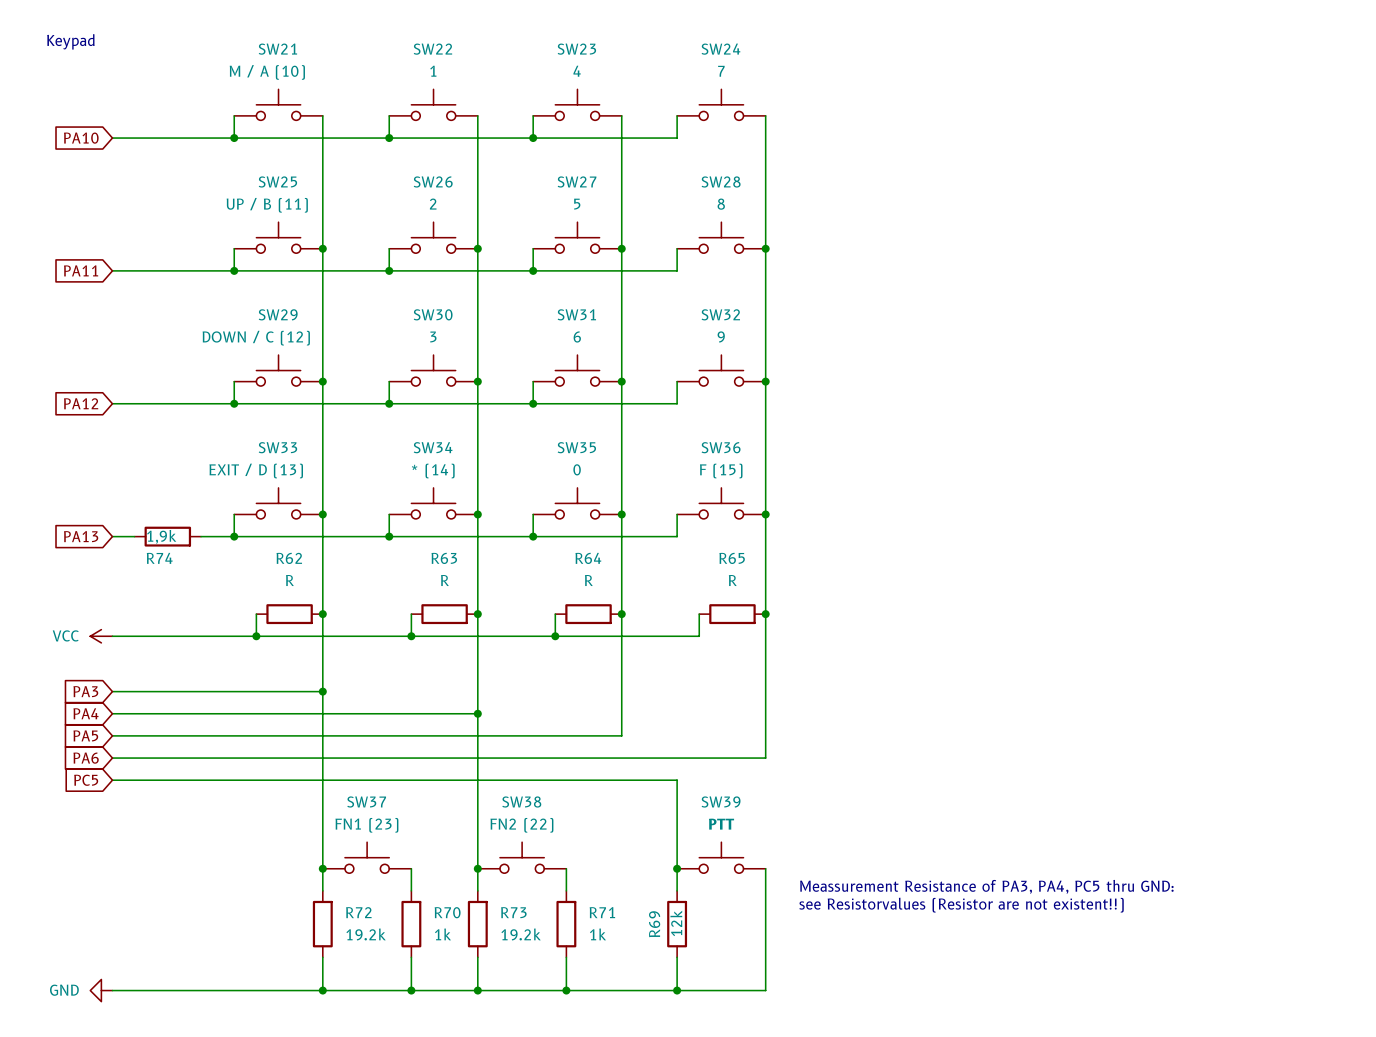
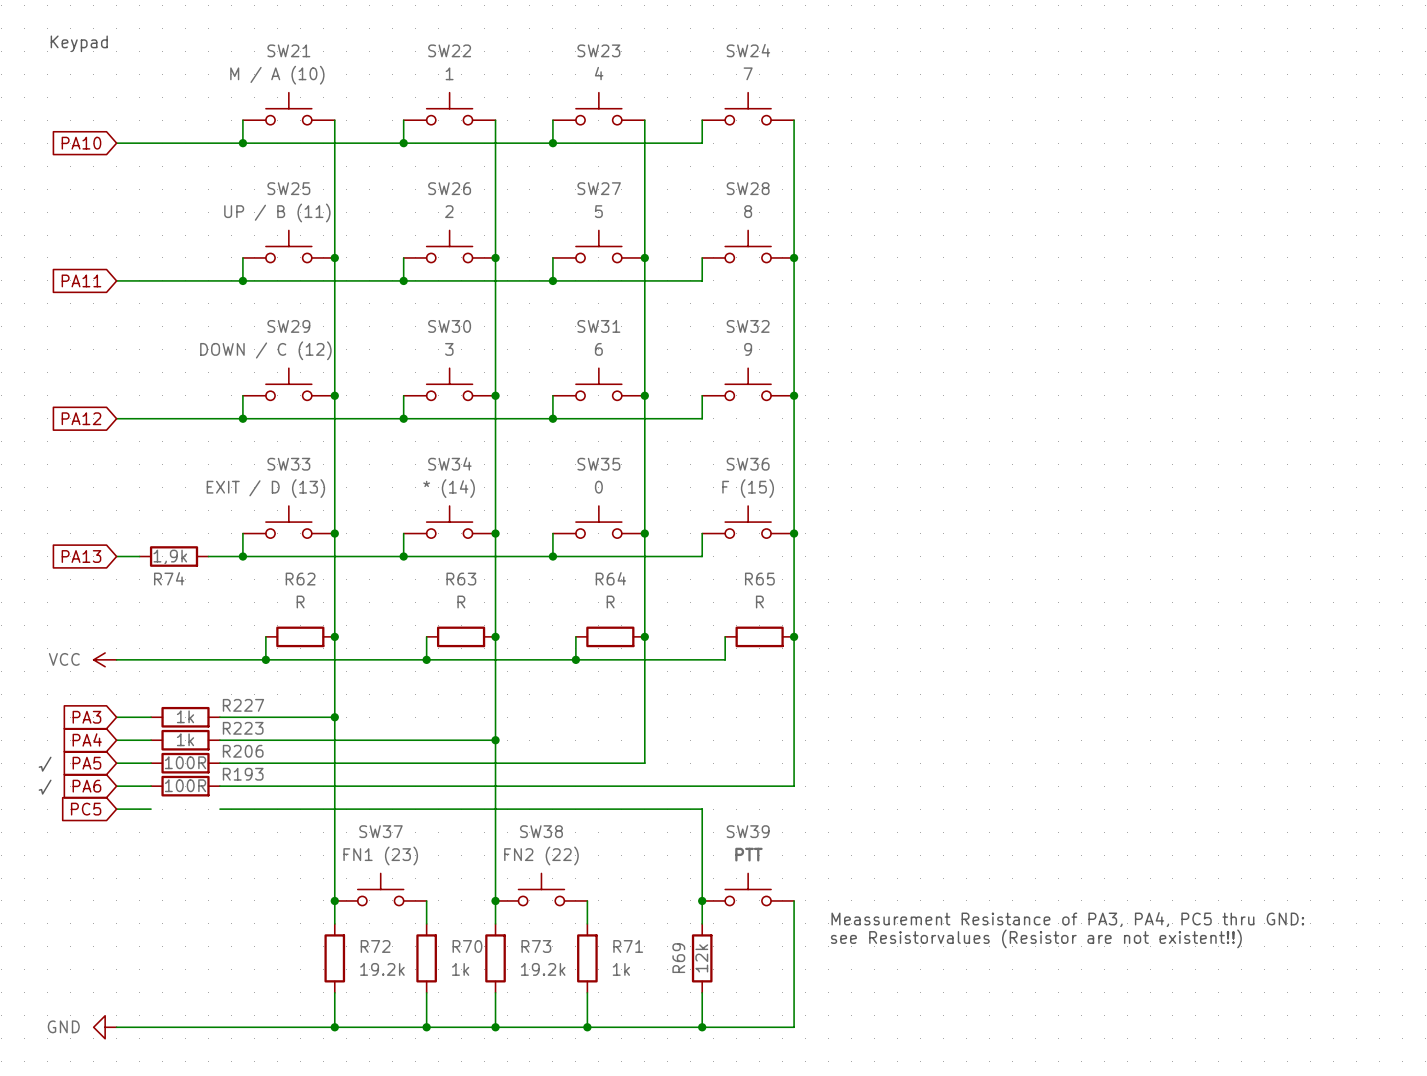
wire: (145, 691) (212, 691) -> none
R227: none -> 1k (185, 717)
wire: (145, 713) (212, 713) -> none
R223: none -> 1k (185, 740)
R206: none -> 100R (185, 763)
text: none -> √ (45, 764)
R193: none -> 100R (185, 786)
text: none -> √ (45, 787)
wire: (145, 780) (212, 780) -> none

